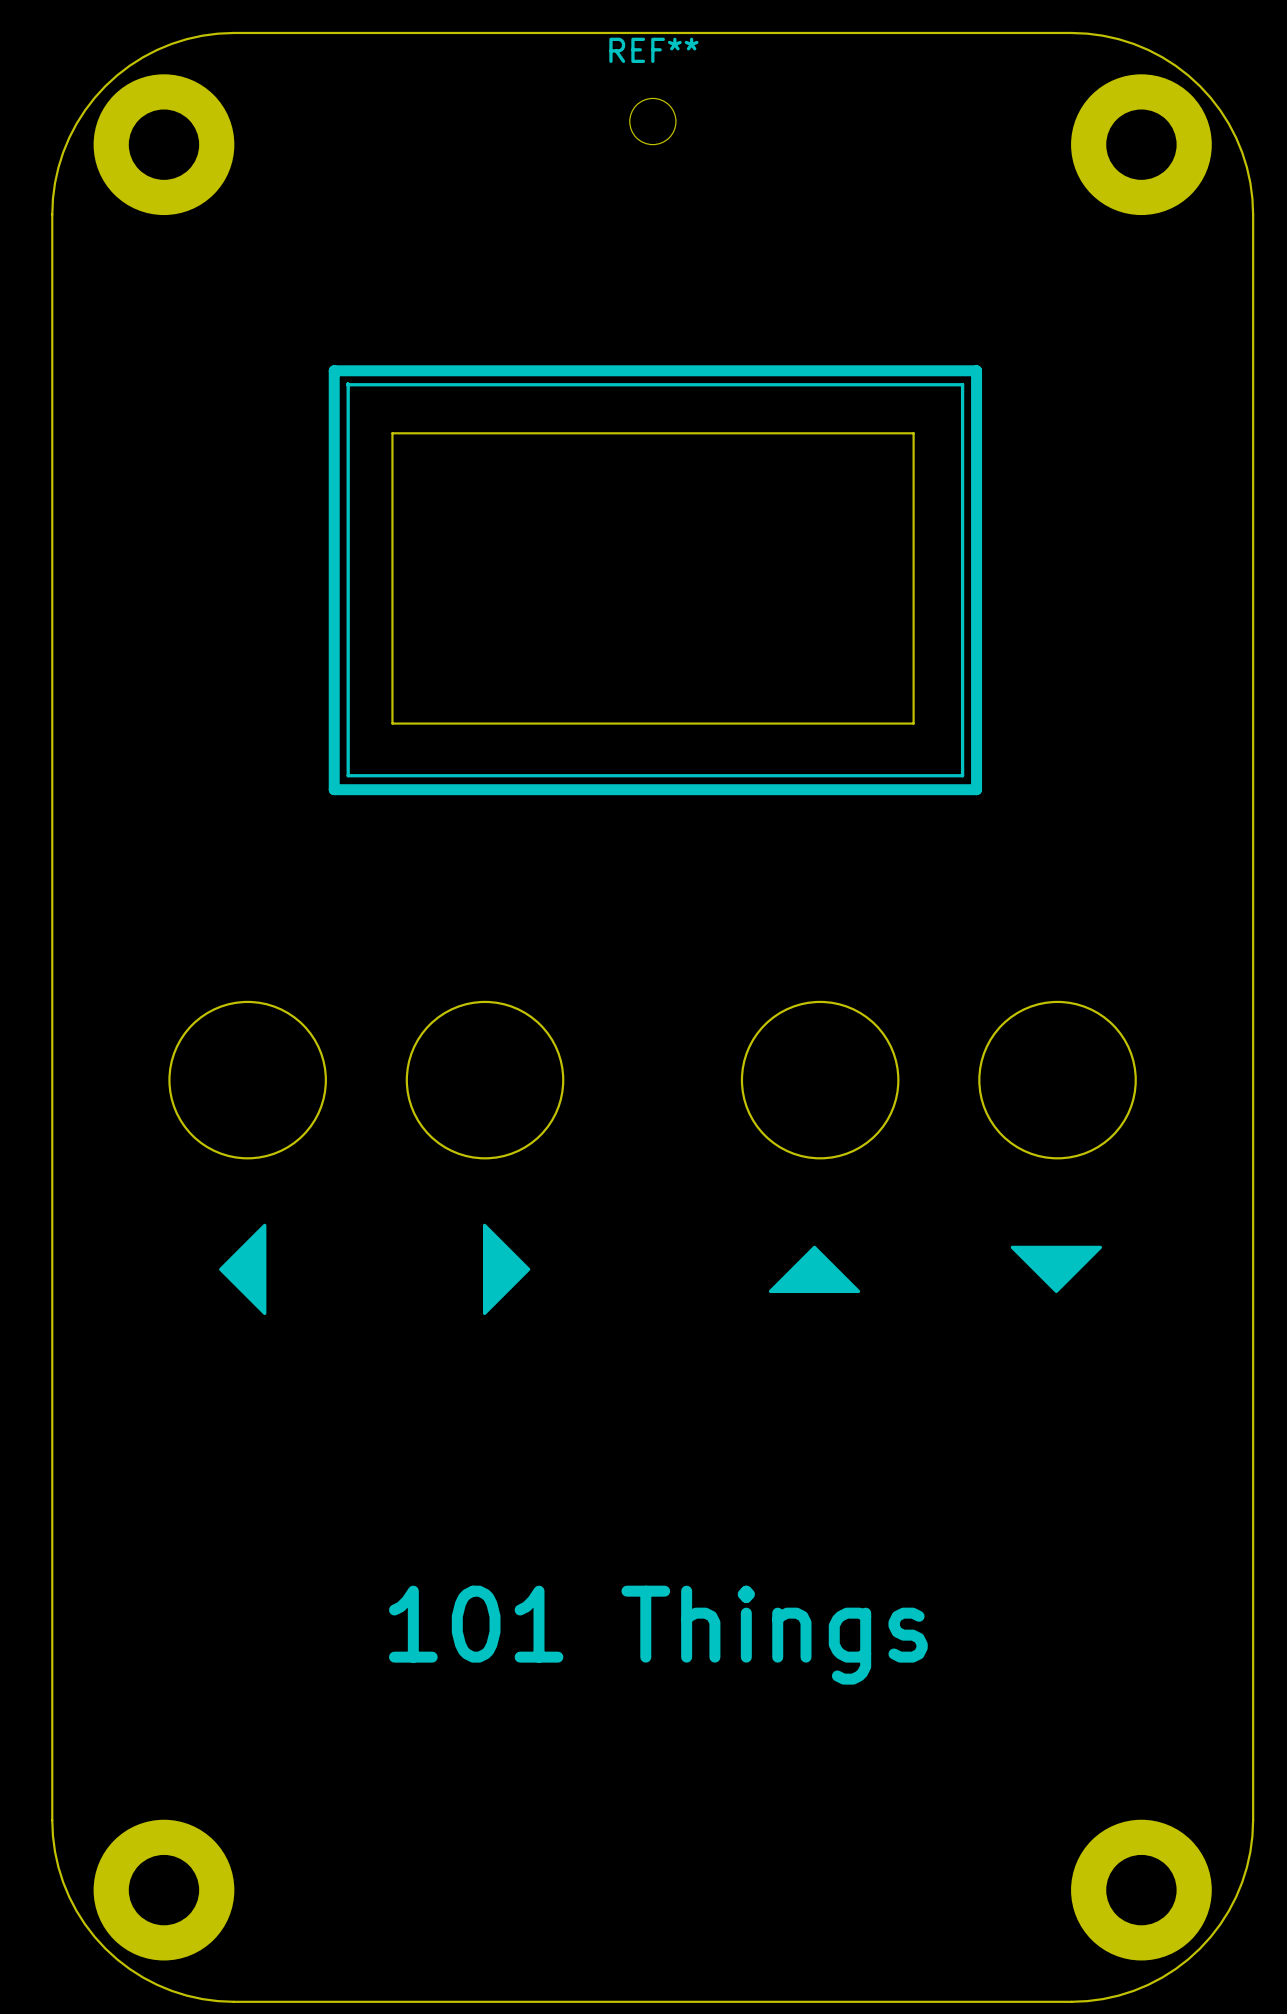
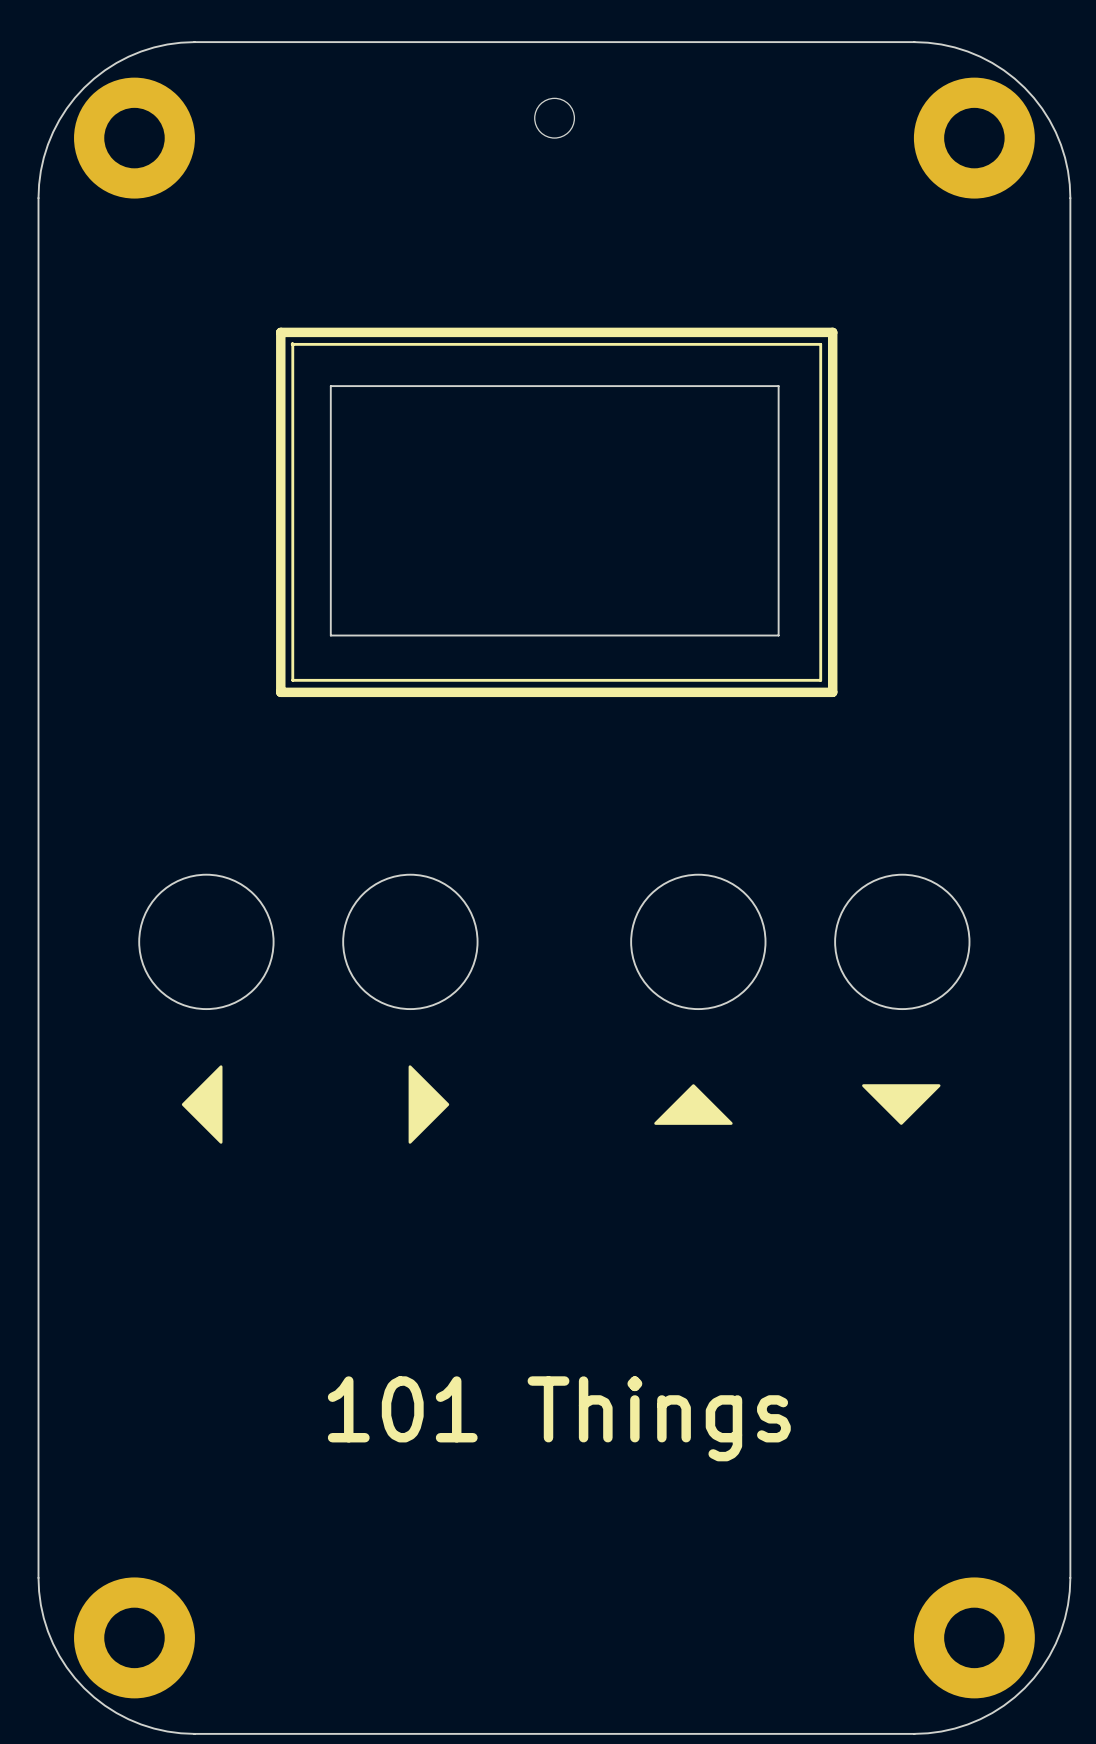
REF** name: REF** (653, 50) -> none

